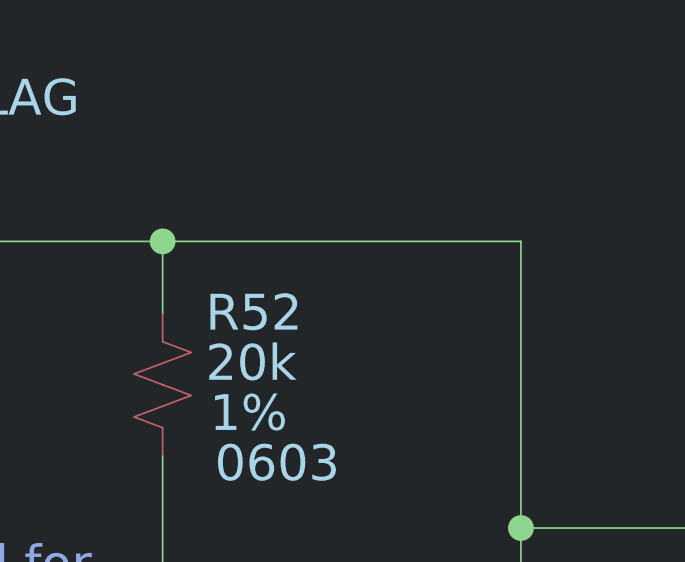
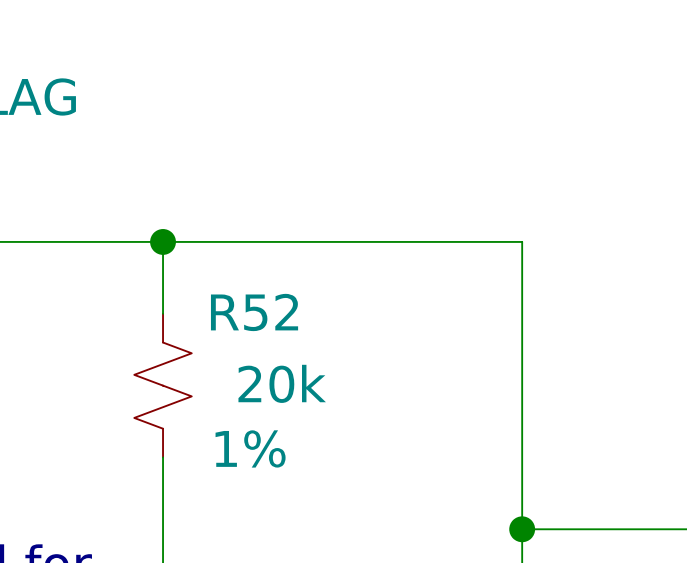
R52 value position: 20k (252, 361) -> 20k (282, 383)
R52 text position: 1% (249, 412) -> 1% (250, 448)
R52 text: 0603 (276, 462) -> none

